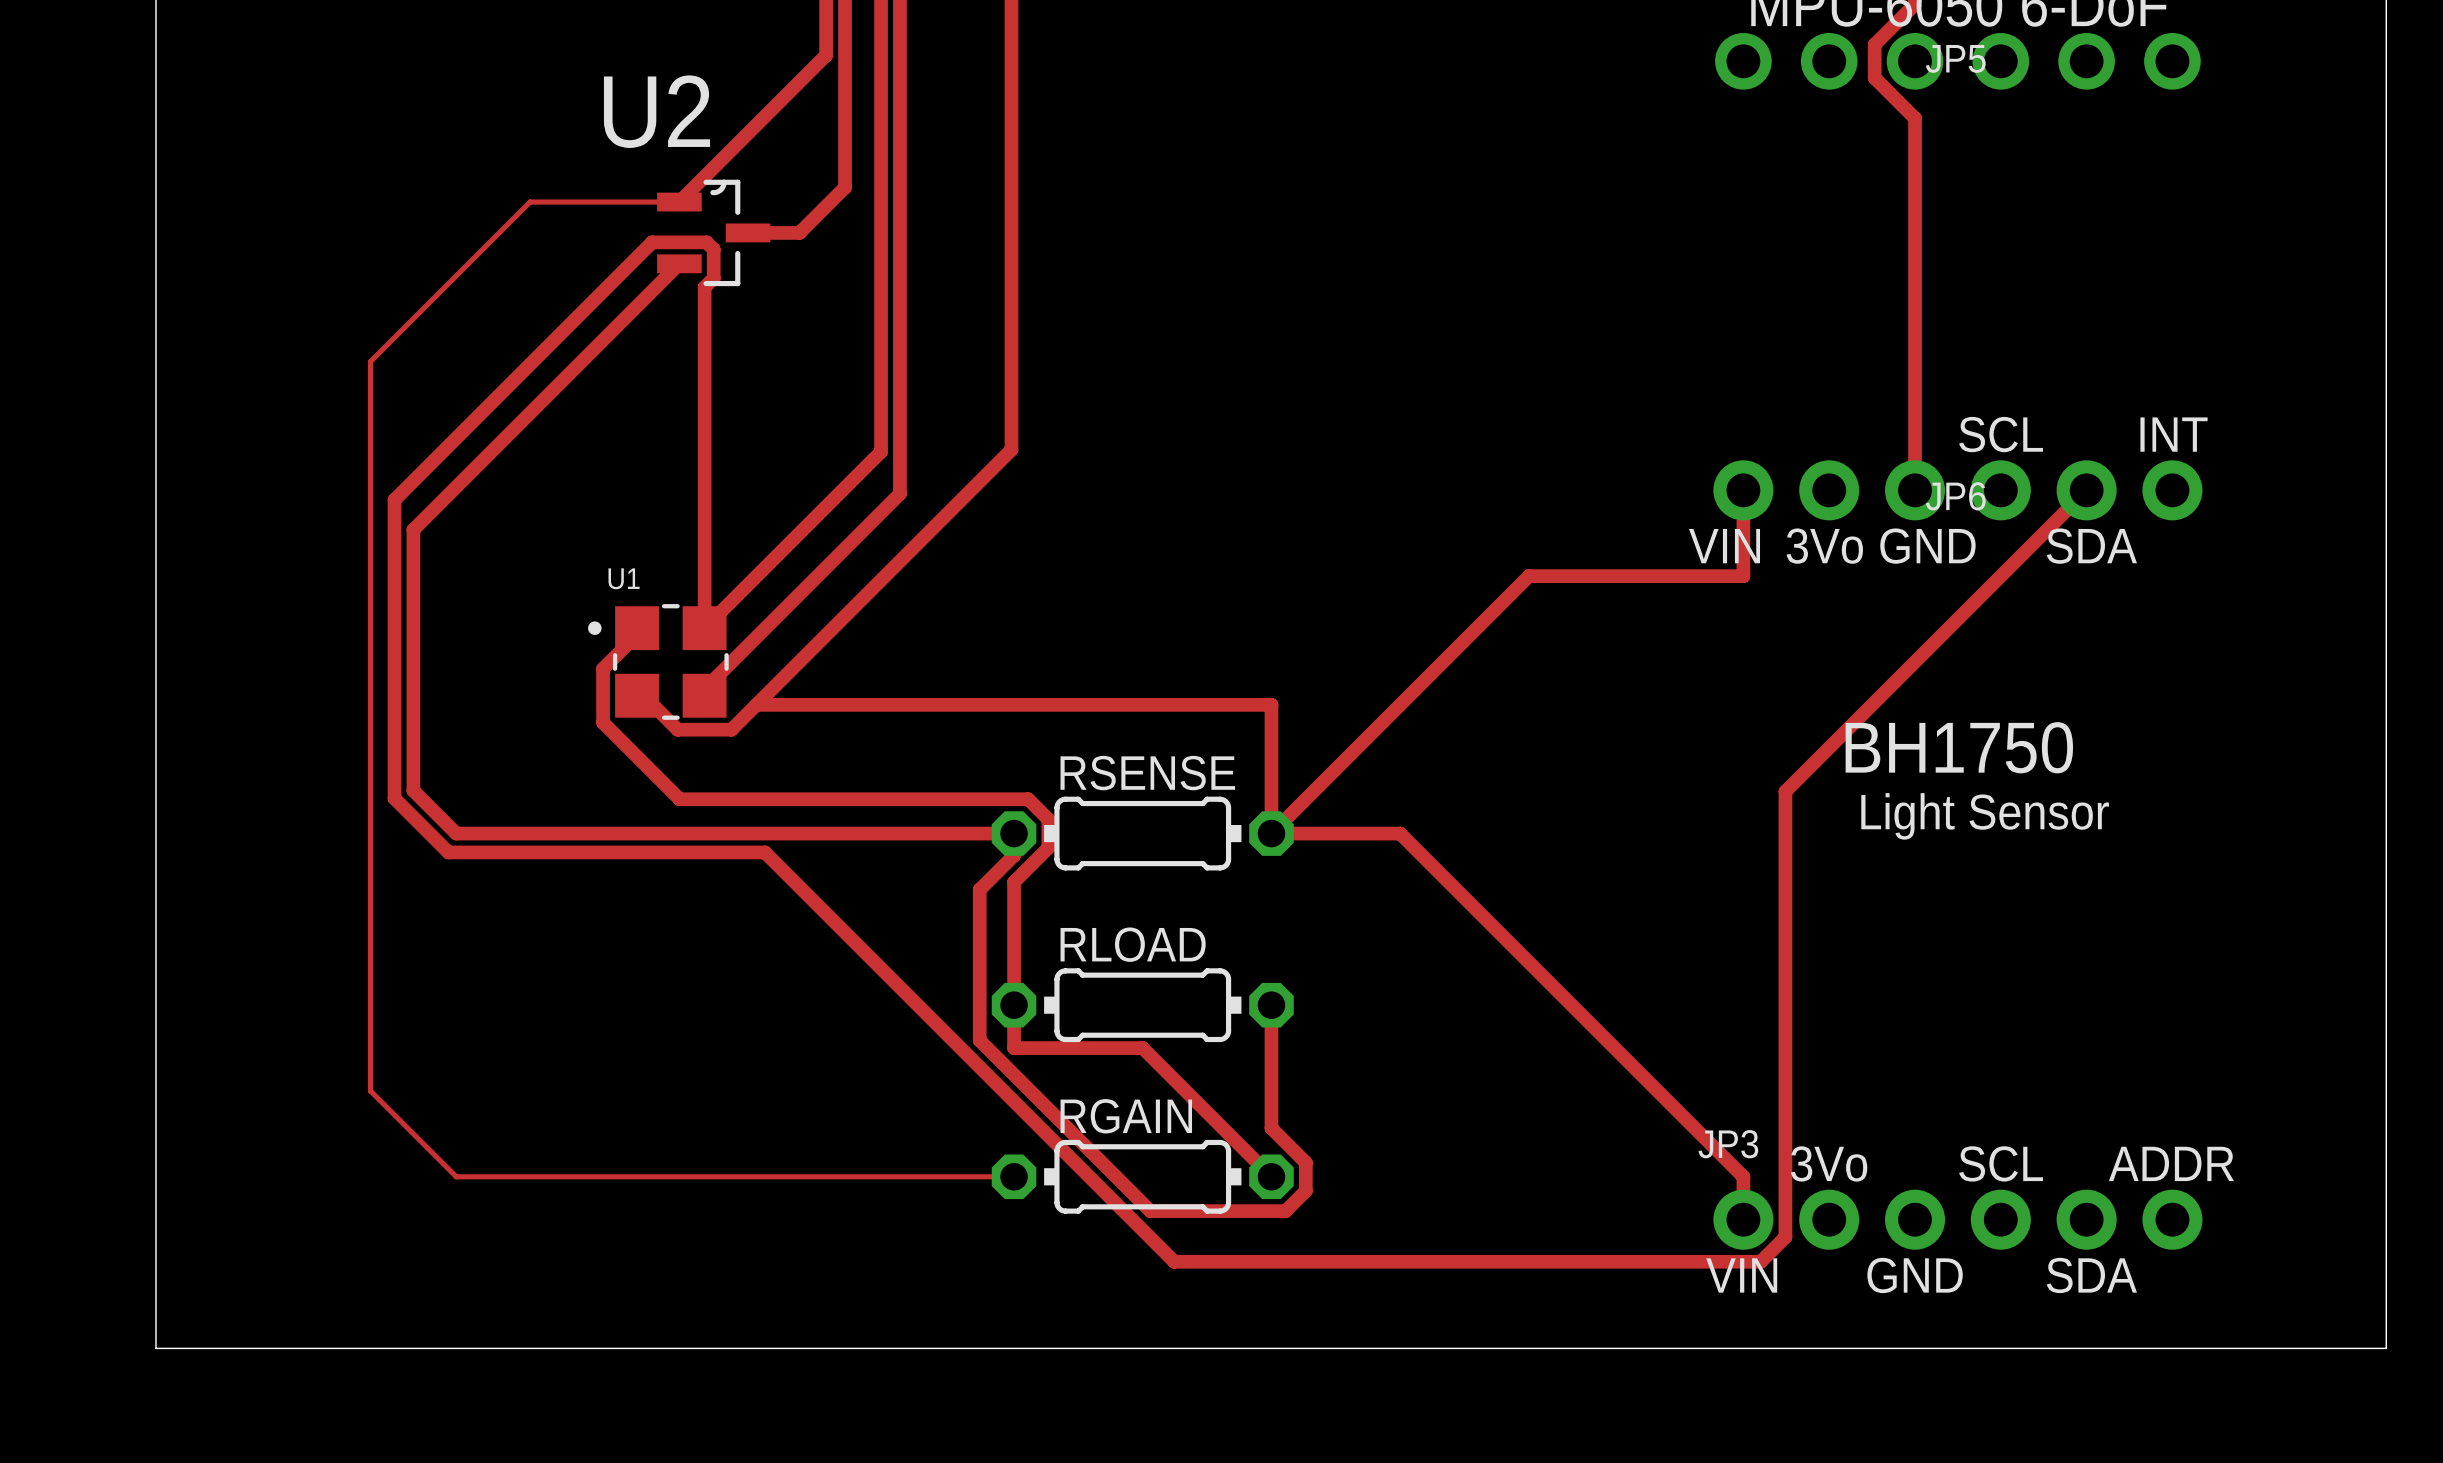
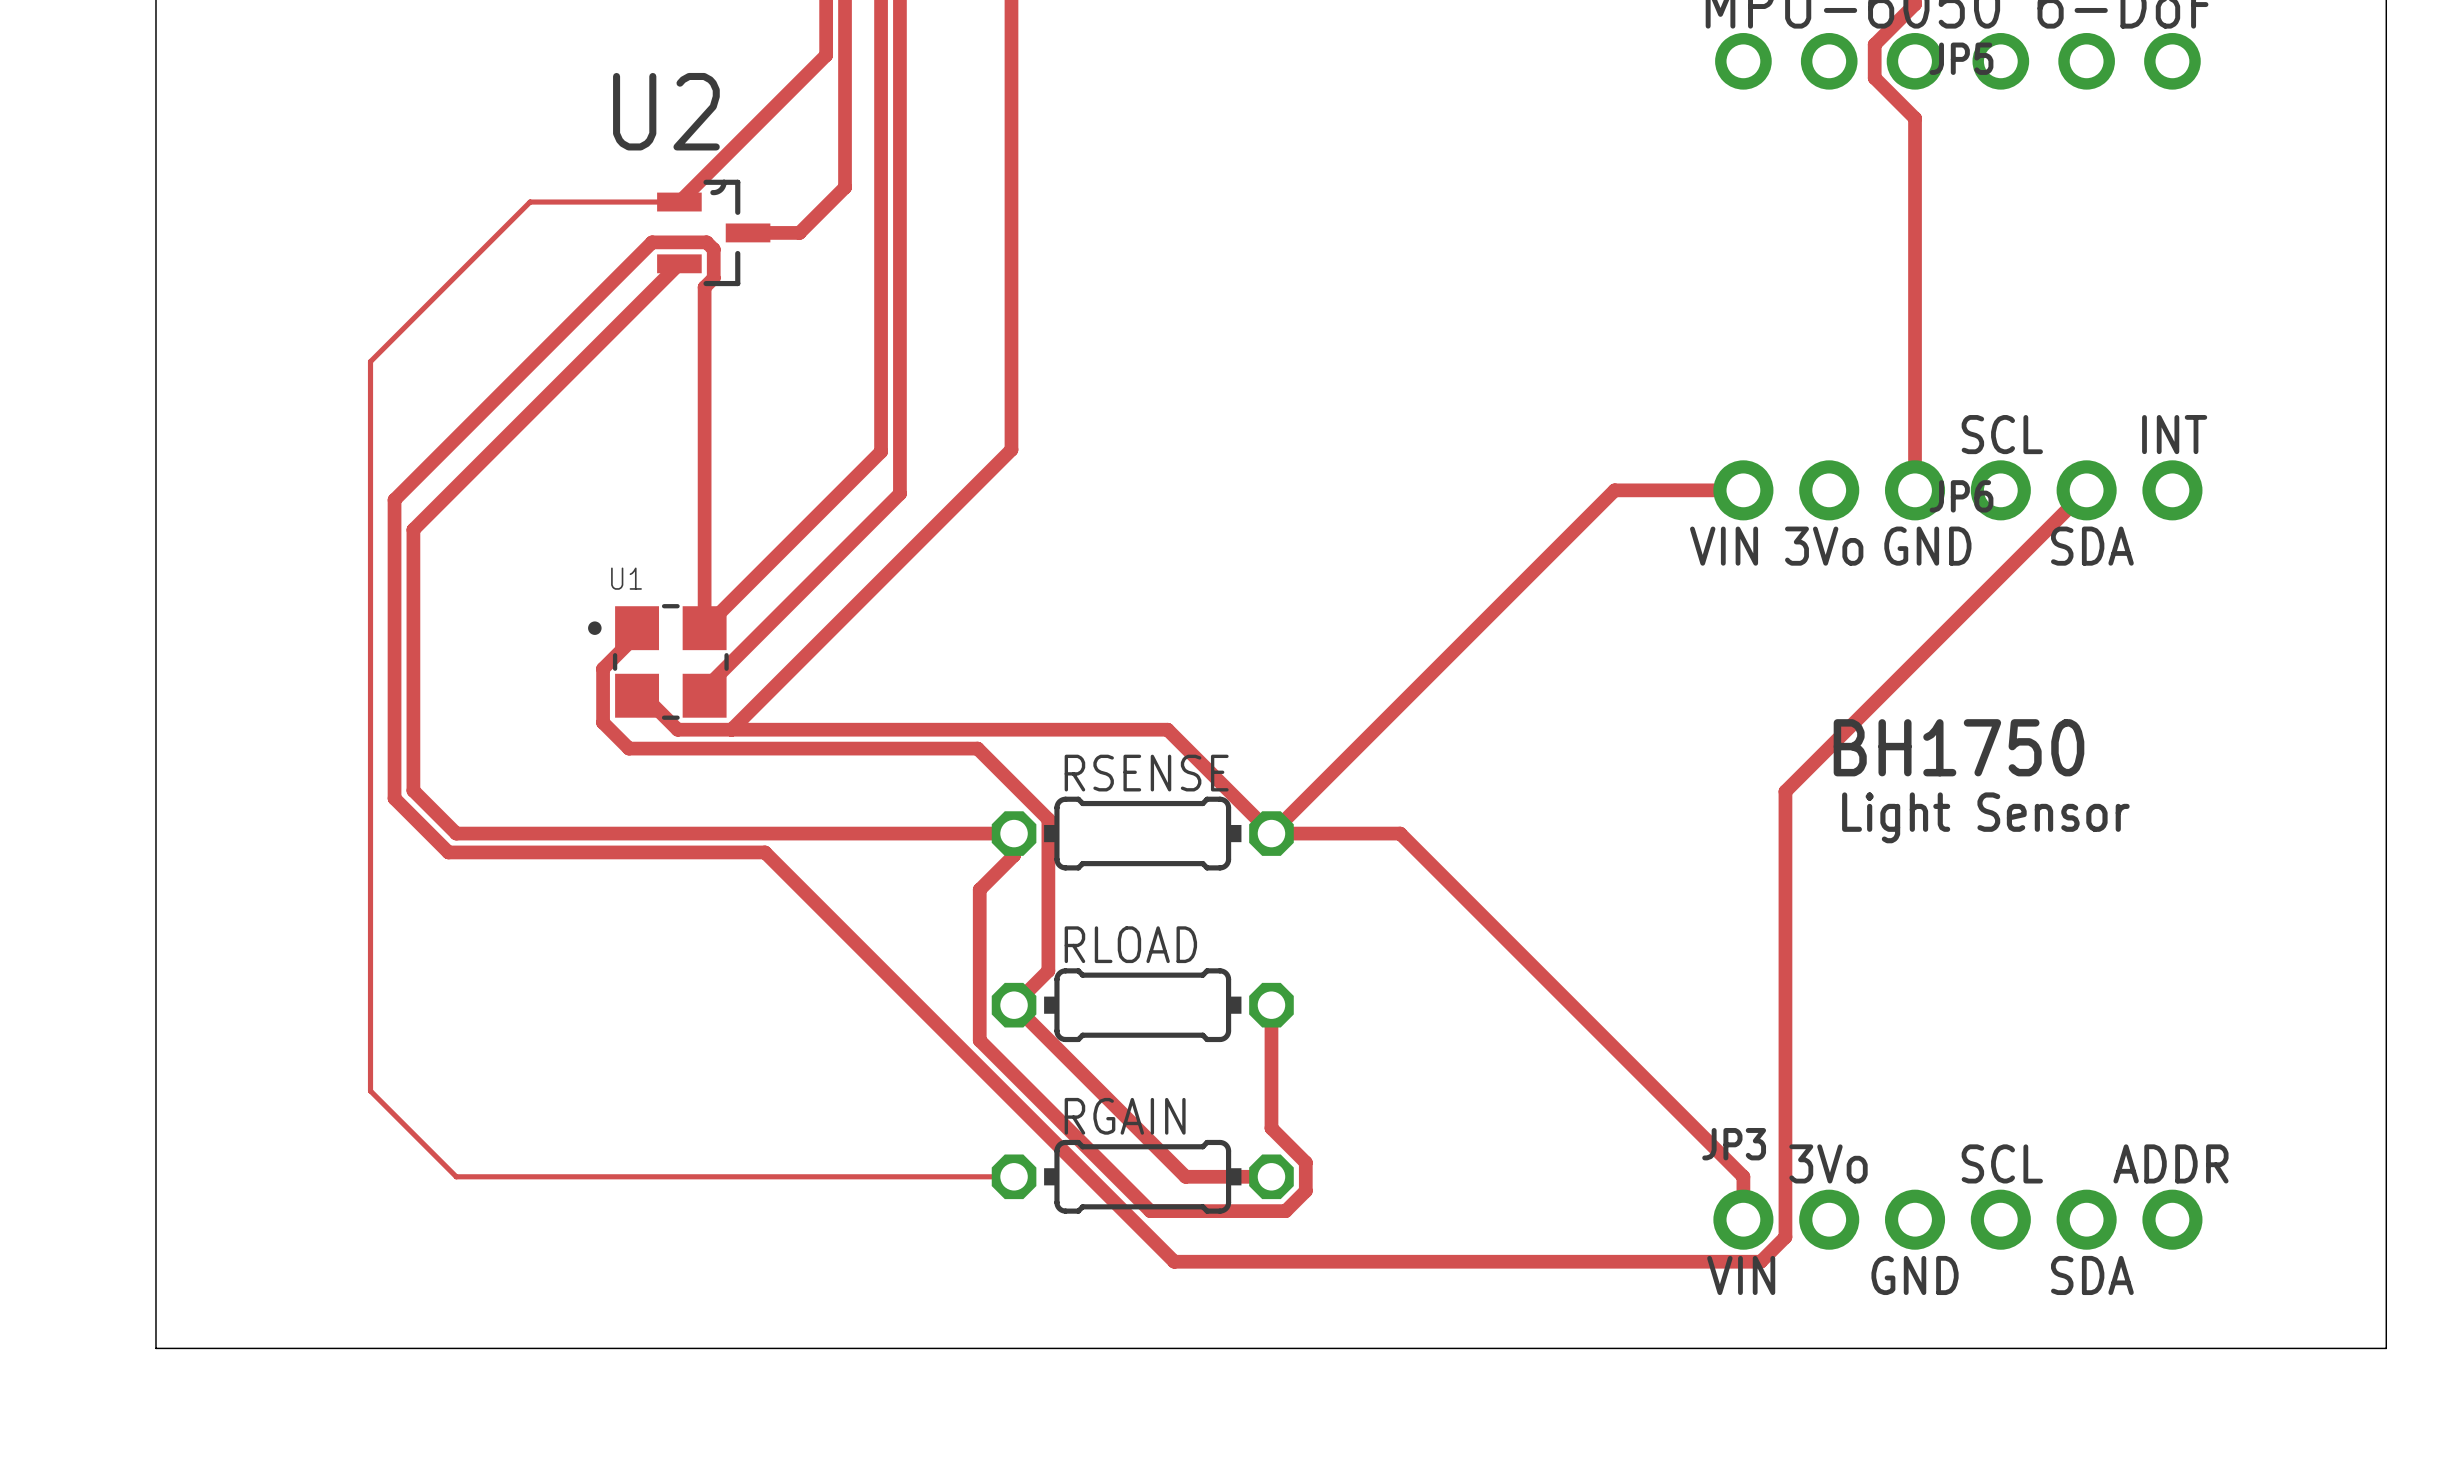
track: (1743, 490) (1743, 576) (1528, 576) -> (1743, 490) (1614, 490) (1528, 576)
track: (756, 704) (1271, 704) (1271, 833) -> (731, 729) (1167, 729) (1271, 833)
track: (628, 748) (679, 799) (1028, 799) -> (628, 748) (977, 748) (1028, 799)
track: (1048, 847) (1014, 882) (1014, 1048) (1142, 1048) (1271, 1176) -> (1048, 847) (1048, 970) (1014, 1005) (1185, 1176) (1271, 1176)

